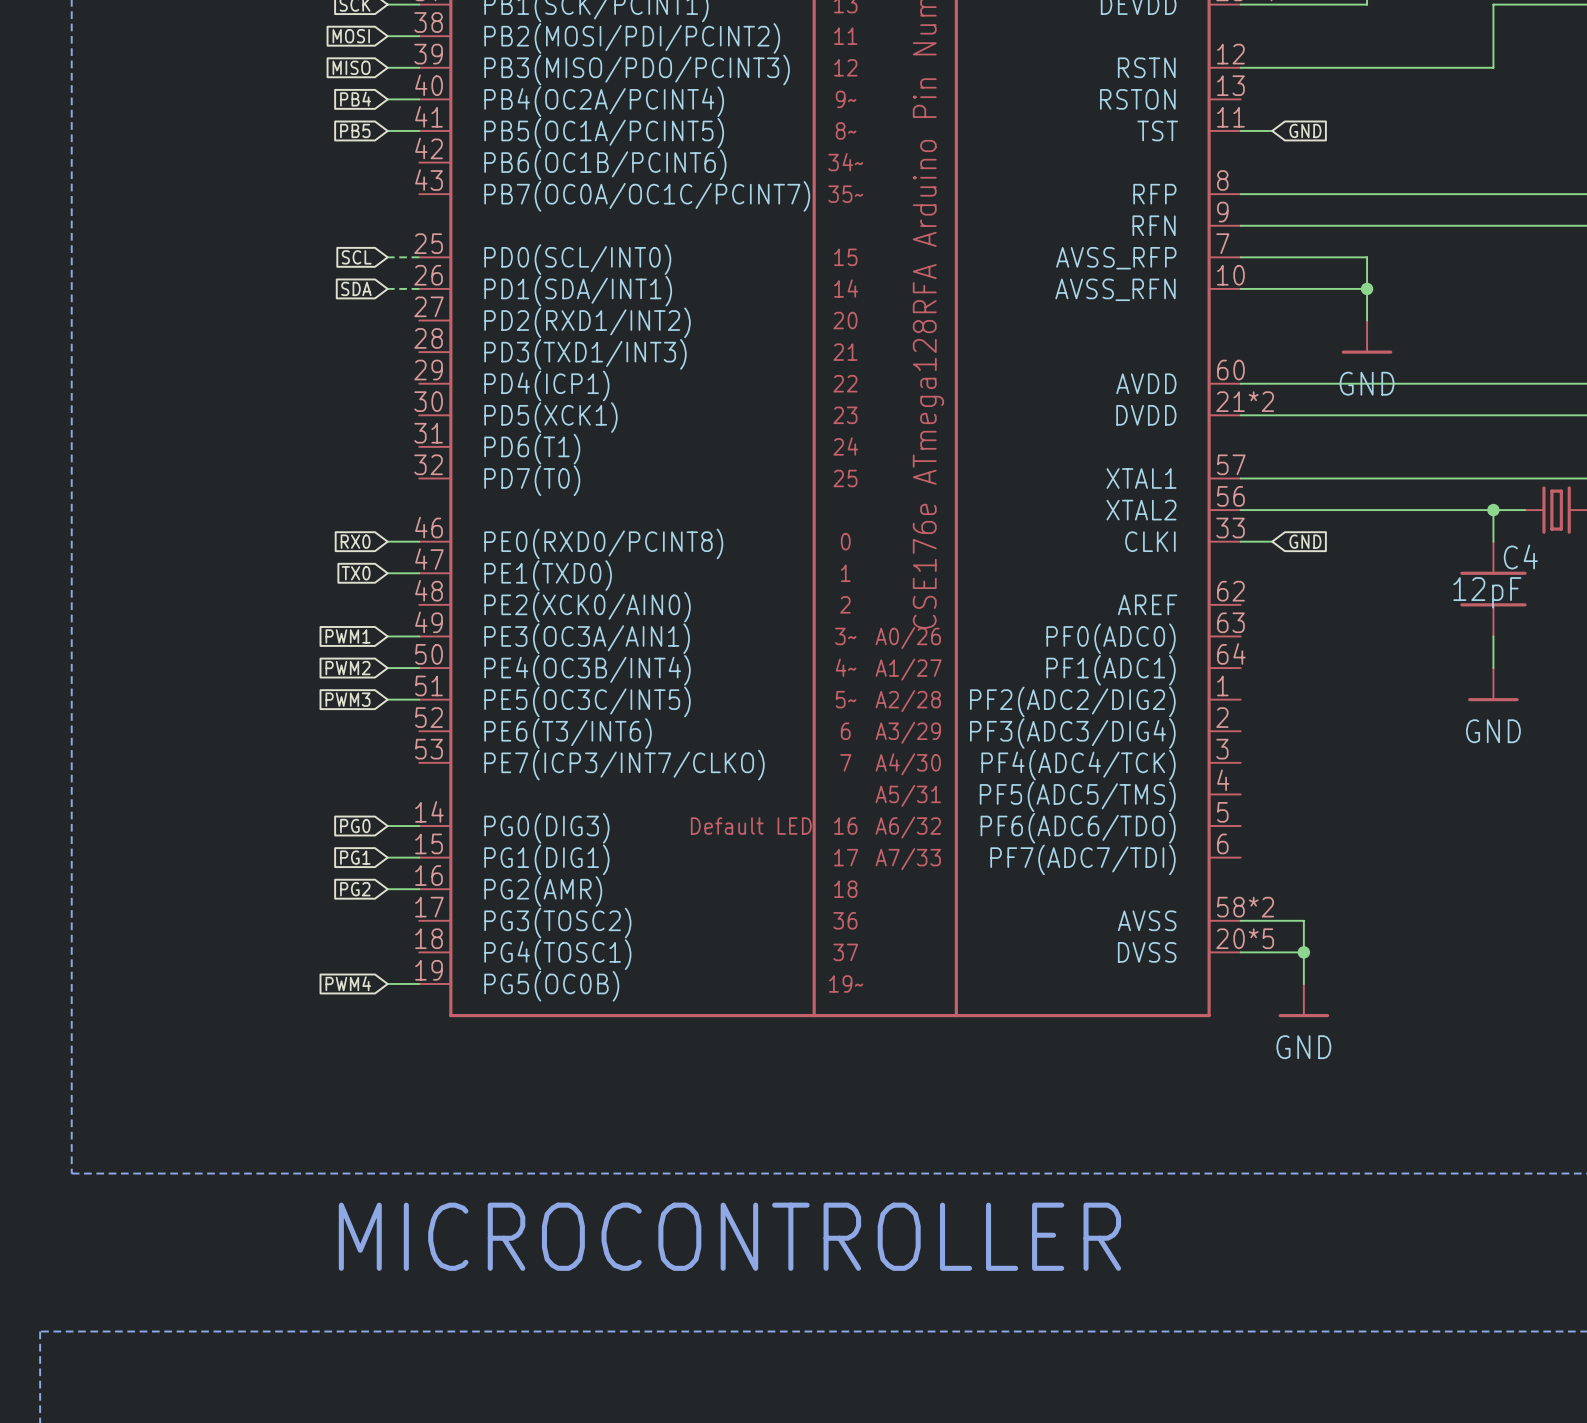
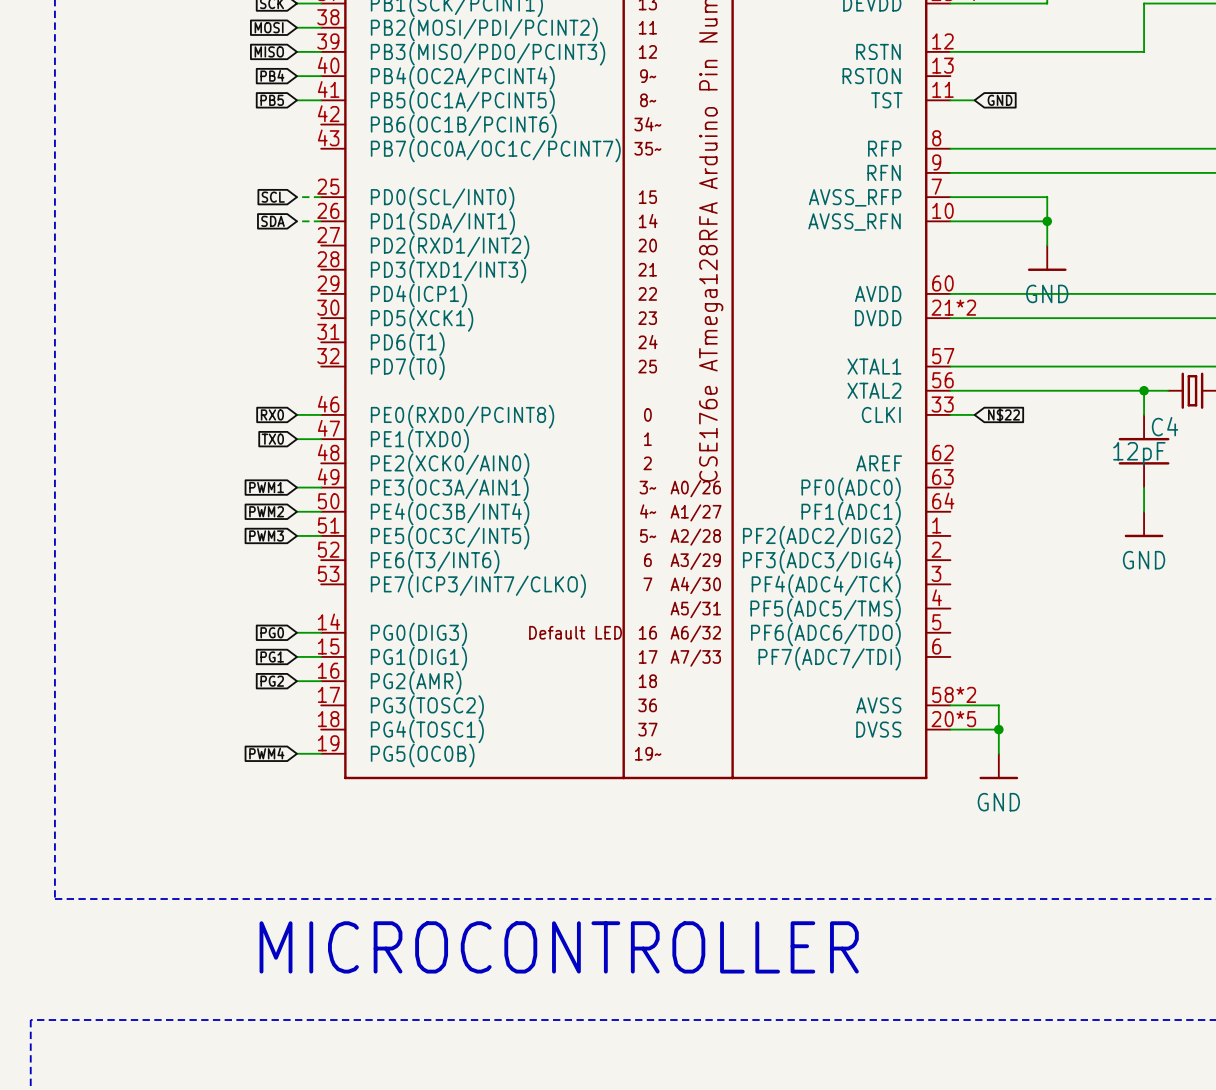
global label: GND (1305, 541) -> N$22 (1003, 414)

